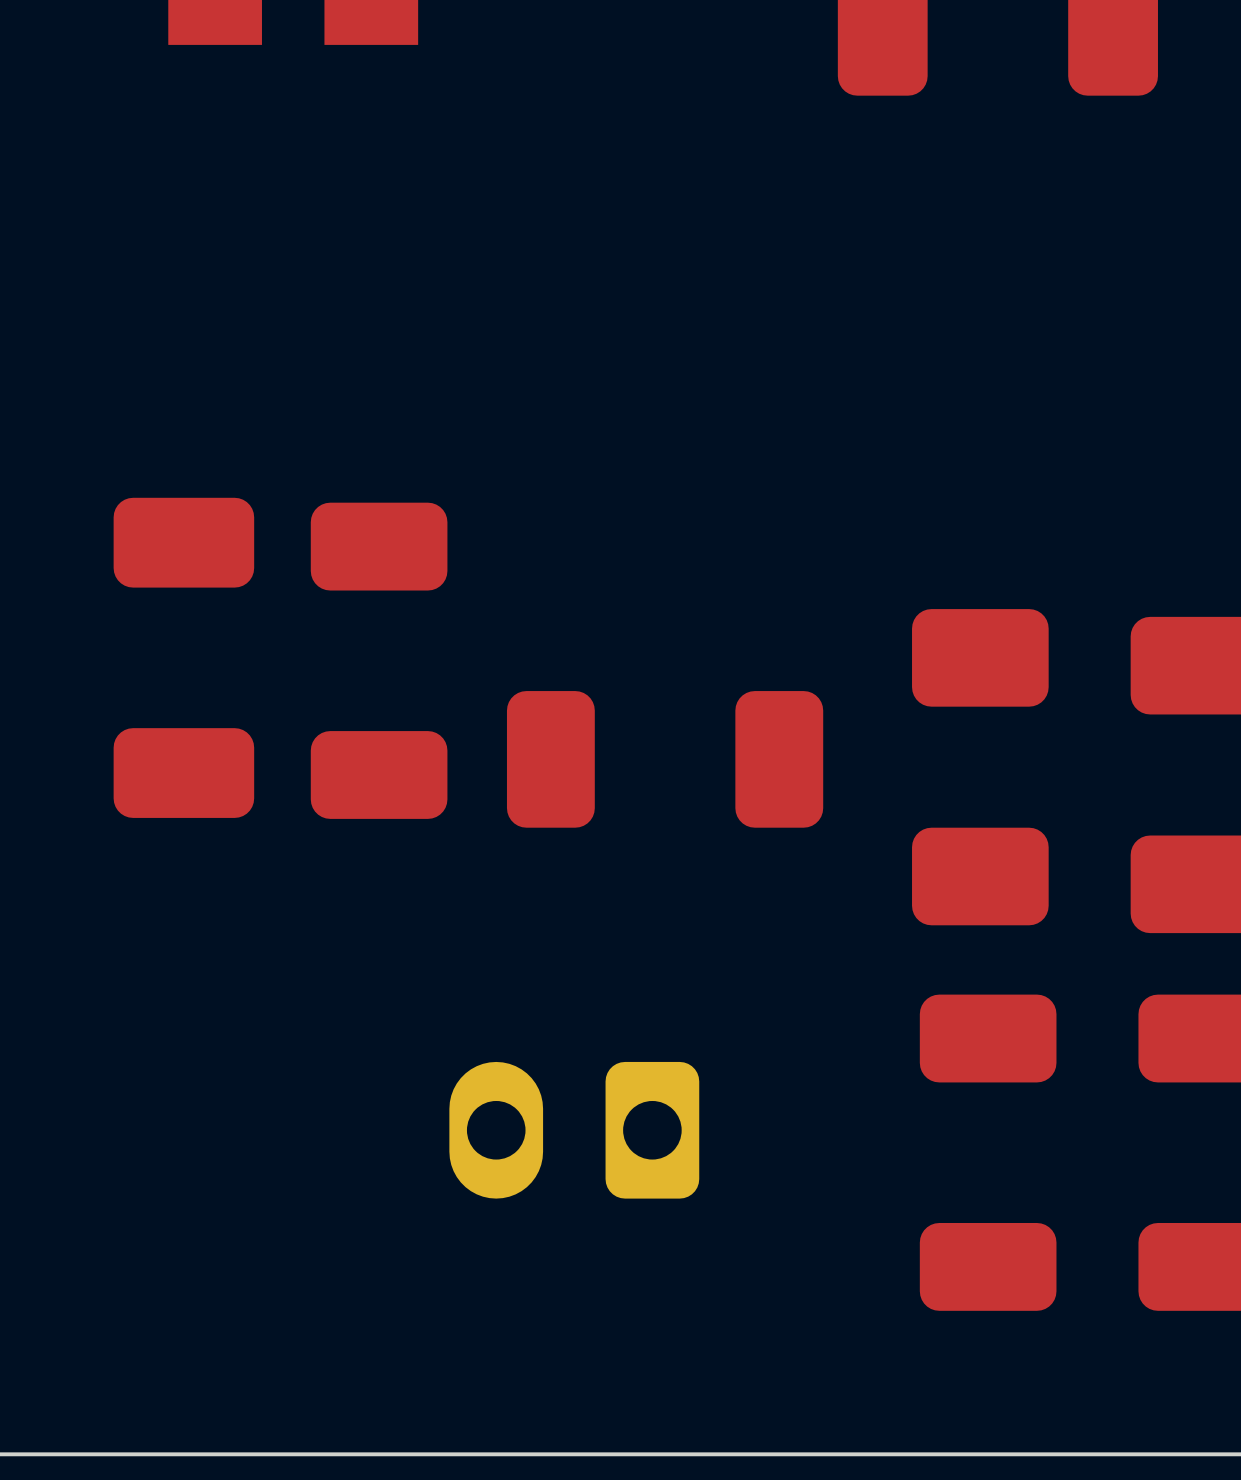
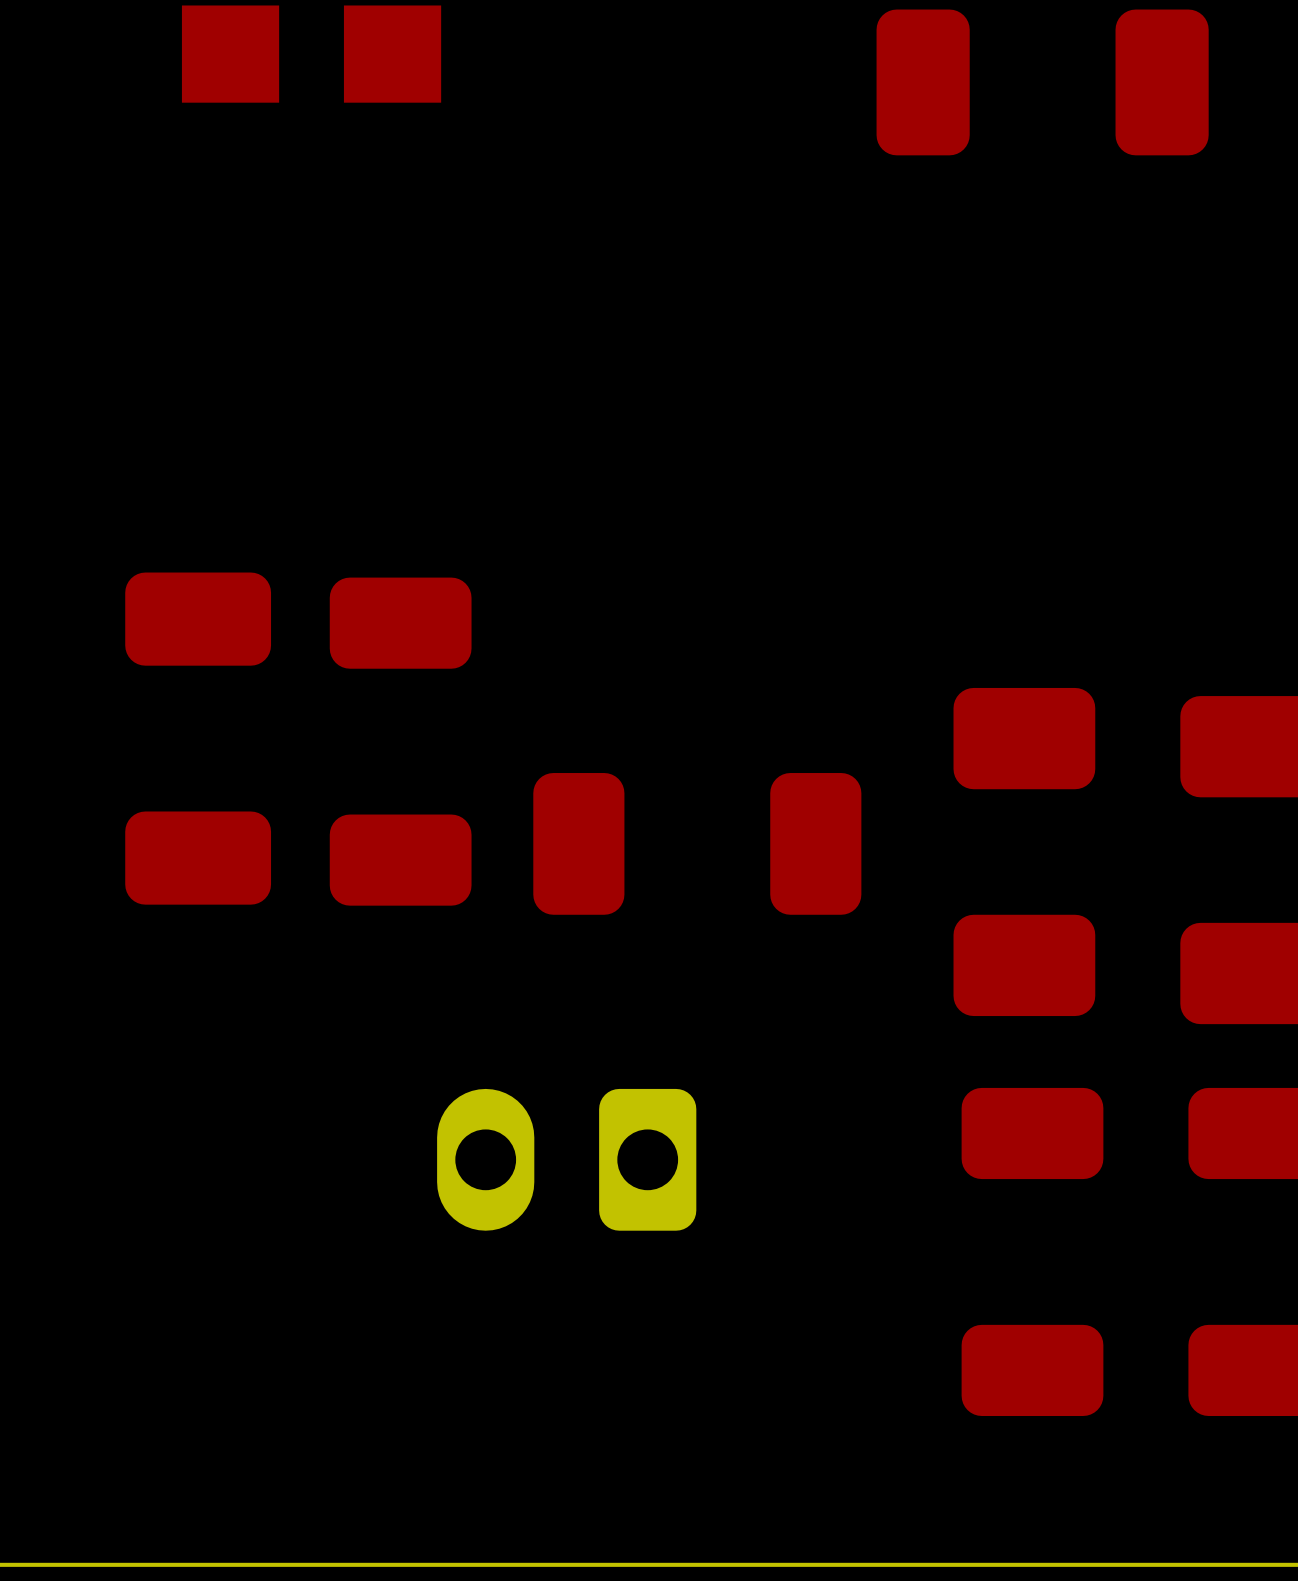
part position: (574, 1130) -> (566, 1159)

